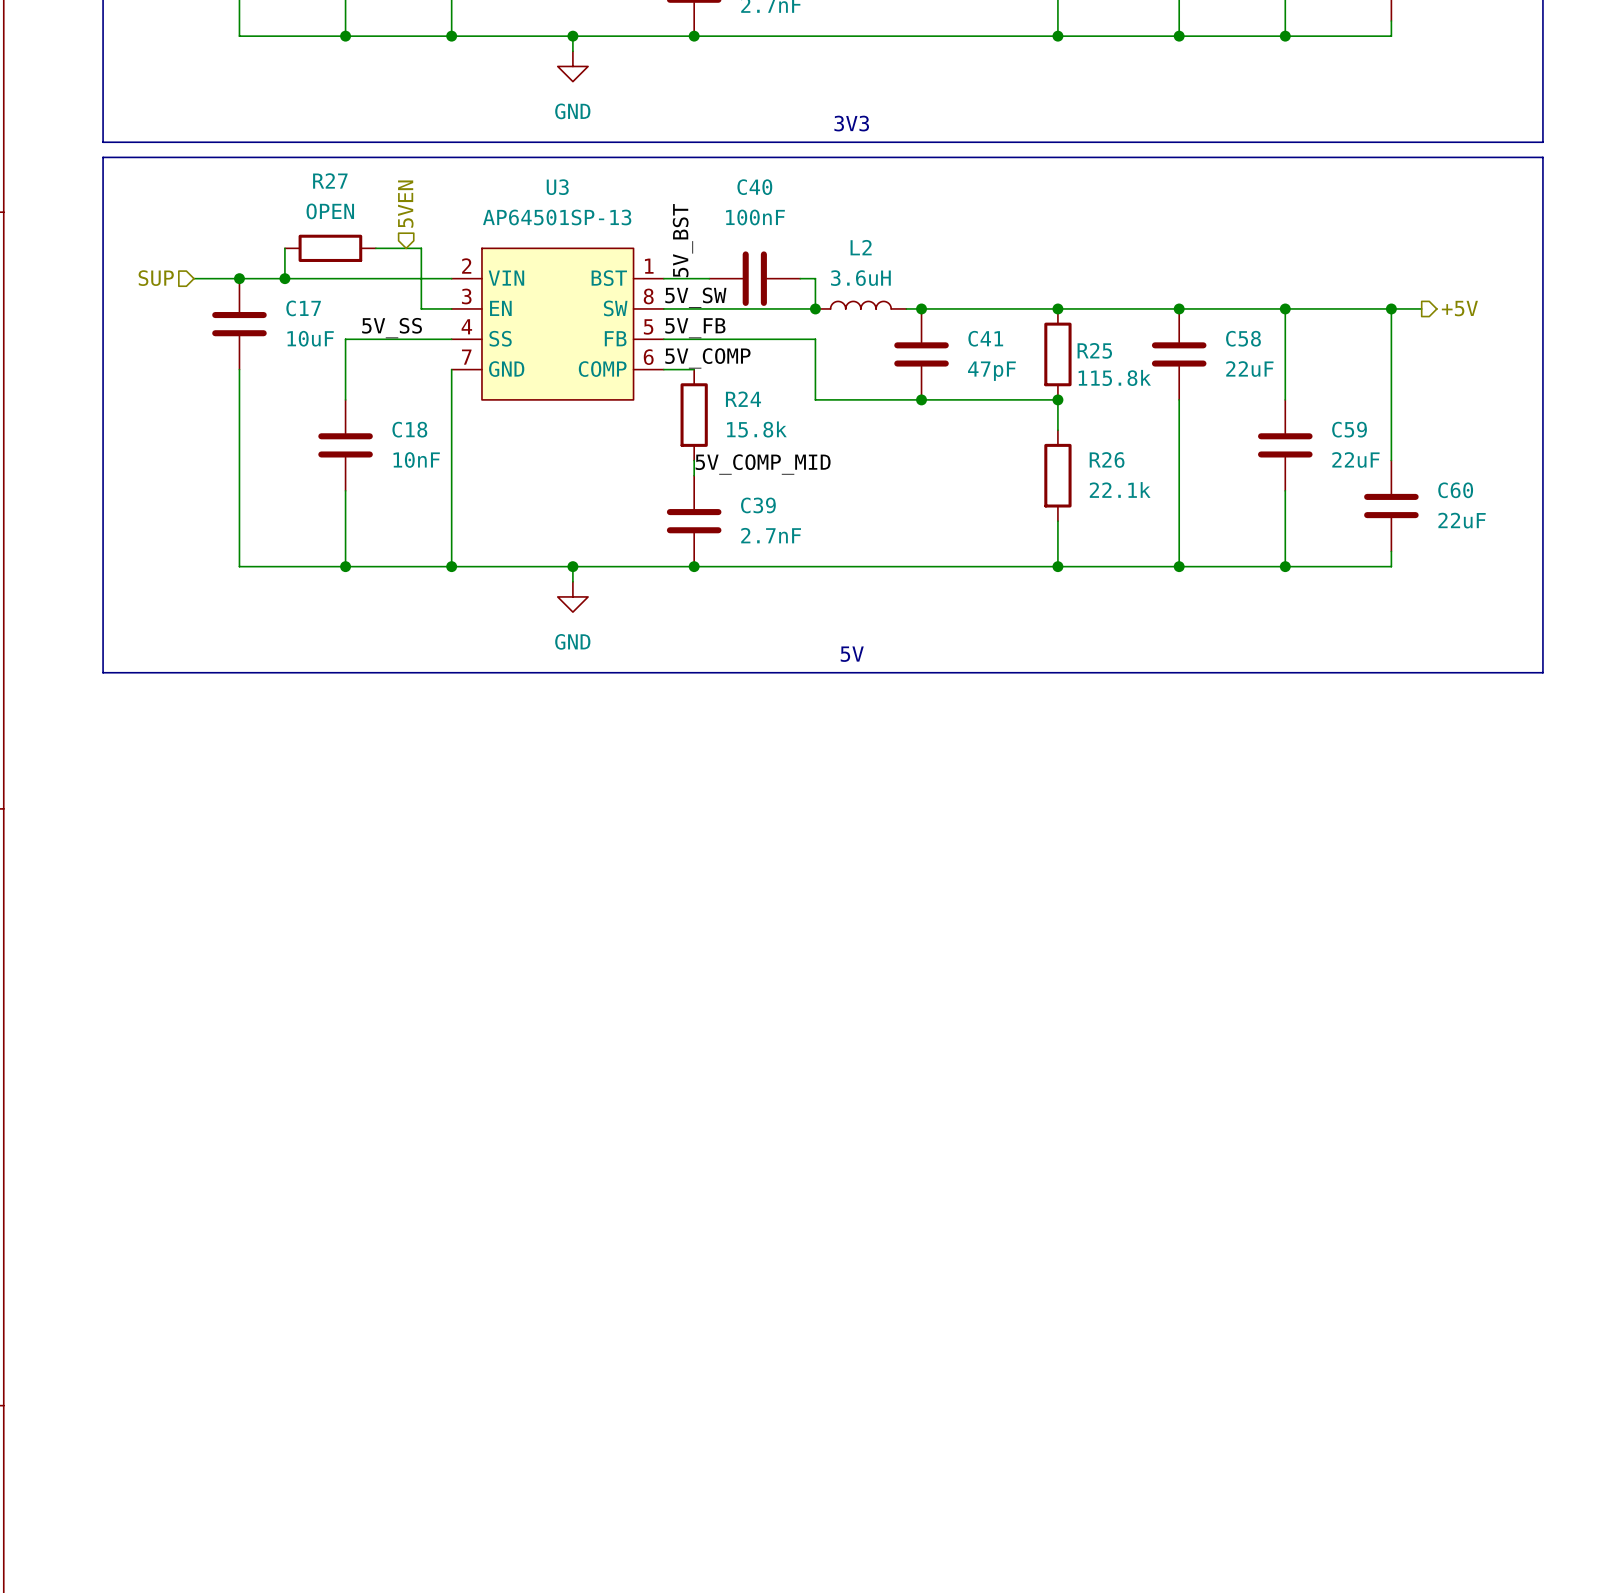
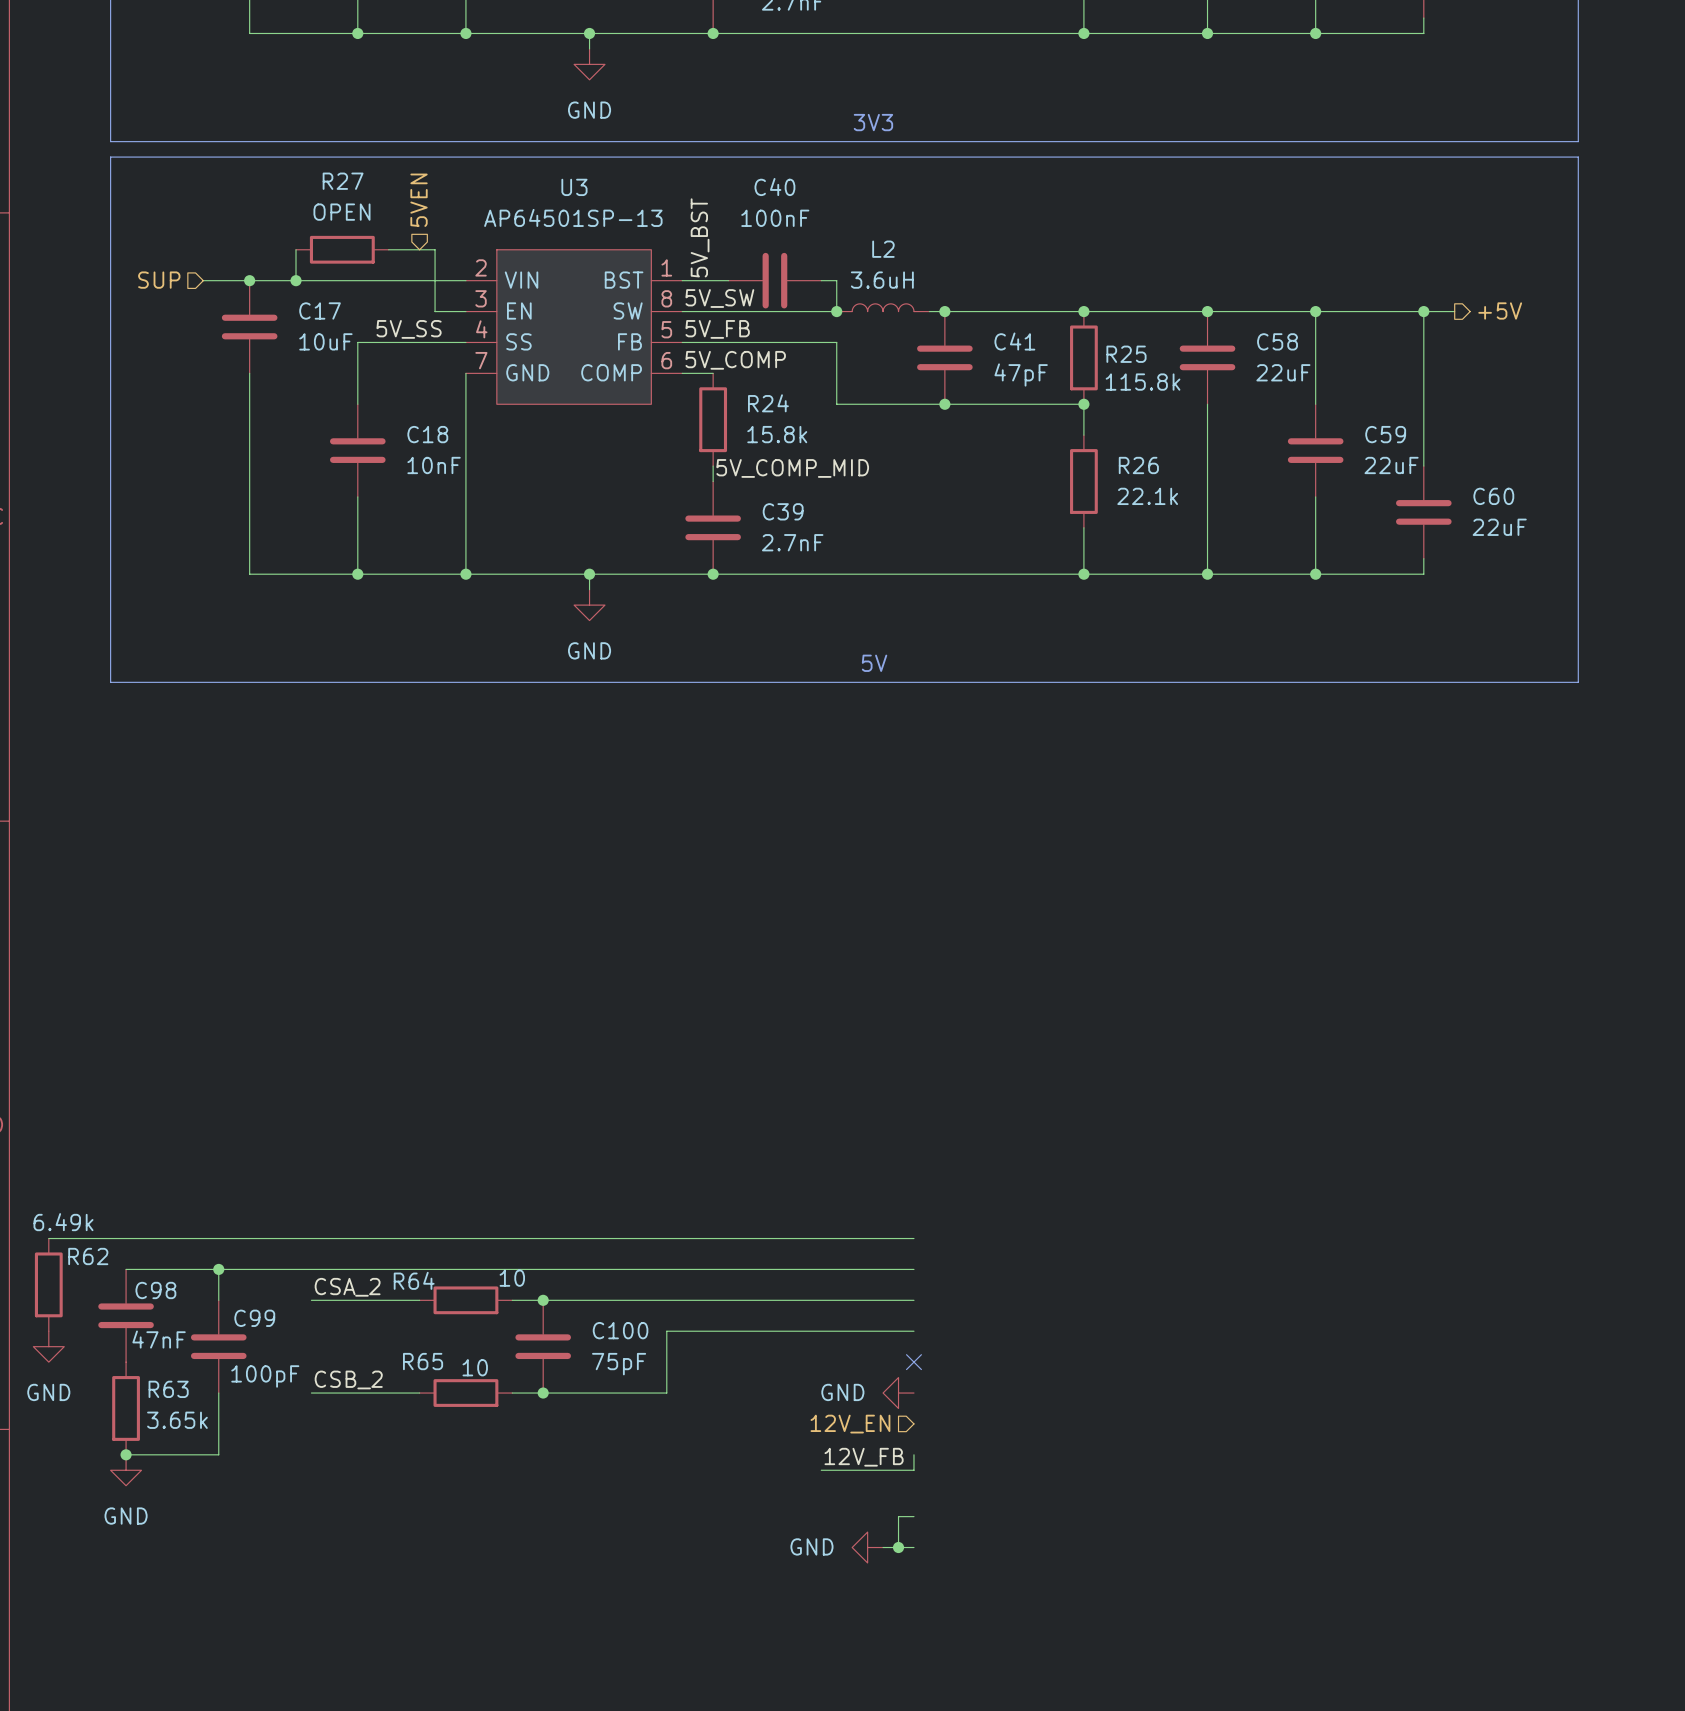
wire: none -> (48, 1238) (913, 1238)
wire: none -> (126, 1269) (913, 1269)
wire: none -> (218, 1269) (218, 1300)
junction: none -> (218, 1269)
R62: none -> 6.49k (48, 1284)
label: none -> CSA_2 (347, 1287)
wire: none -> (311, 1300) (419, 1300)
R64: none -> 10 (465, 1300)
wire: none -> (512, 1300) (913, 1300)
junction: none -> (543, 1300)
C98: none -> 47nF (126, 1315)
wire: none -> (913, 1331) (666, 1331) (666, 1393) (512, 1393)
power symbol: none -> GND (48, 1346)
C99: none -> 100pF (218, 1346)
C100: none -> 75pF (543, 1346)
no-connect mark: none -> (913, 1362)
label: none -> CSB_2 (348, 1379)
wire: none -> (218, 1393) (218, 1454) (126, 1454)
wire: none -> (311, 1393) (419, 1393)
R65: none -> 10 (465, 1393)
junction: none -> (543, 1393)
power symbol: none -> GND (898, 1393)
R63: none -> 3.65k (126, 1408)
hierarchical label: none -> 12V_EN (850, 1424)
junction: none -> (126, 1454)
wire: none -> (913, 1454) (913, 1470) (821, 1470)
label: none -> 12V_FB (864, 1457)
power symbol: none -> GND (126, 1470)
wire: none -> (913, 1516) (898, 1516) (898, 1547)
power symbol: none -> GND (867, 1547)
wire: none -> (883, 1547) (913, 1547)
junction: none -> (898, 1547)

